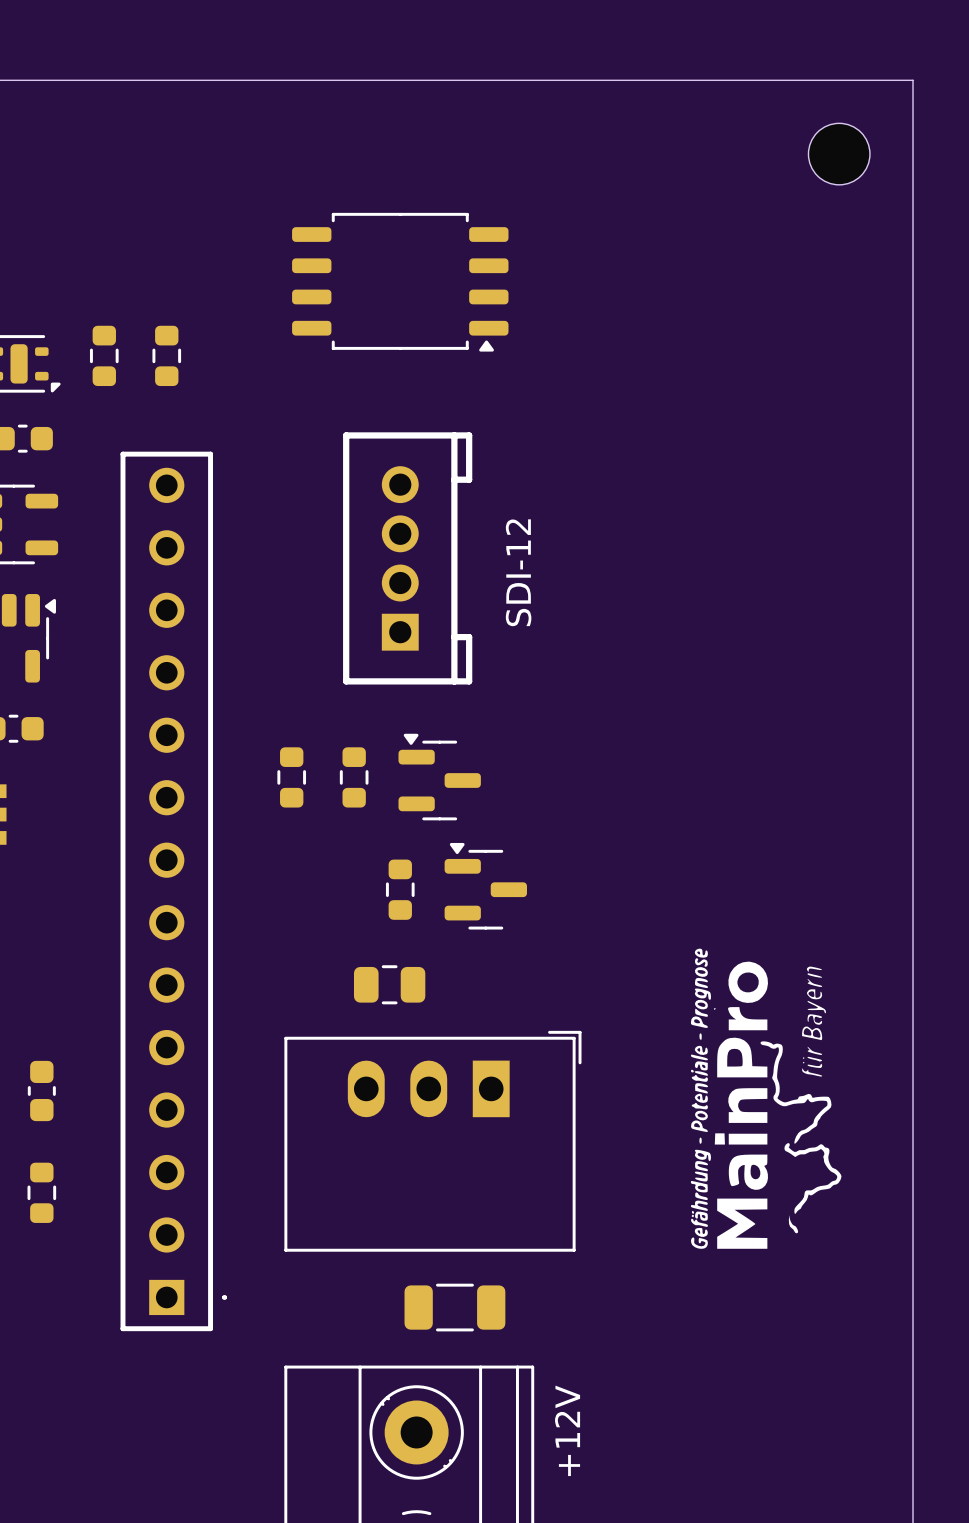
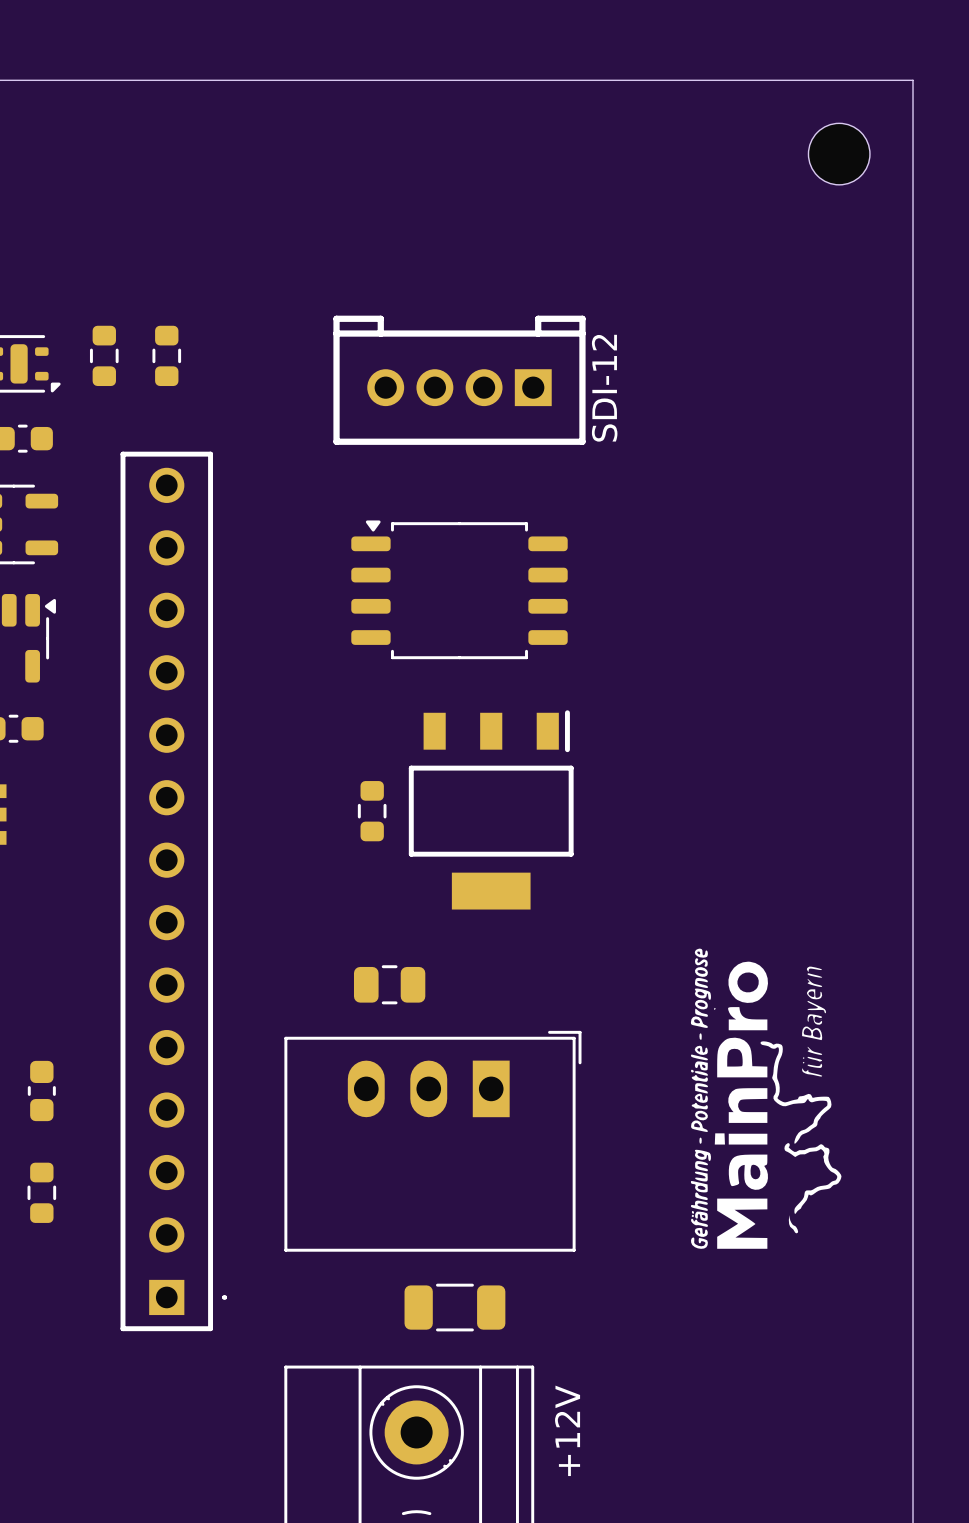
part rotation: 0° (400, 282) -> 180° (459, 589)
part position: (400, 282) -> (459, 589)
part rotation: 0° (407, 558) -> 90° counterclockwise (459, 380)
part position: (407, 558) -> (459, 380)
text position: SDI-12 (518, 572) -> SDI-12 (604, 388)
part: (291, 777) -> none
part position: (354, 777) -> (372, 811)
part: (439, 777) -> none
part: none -> (491, 809)
part: (485, 886) -> none
part: (400, 889) -> none

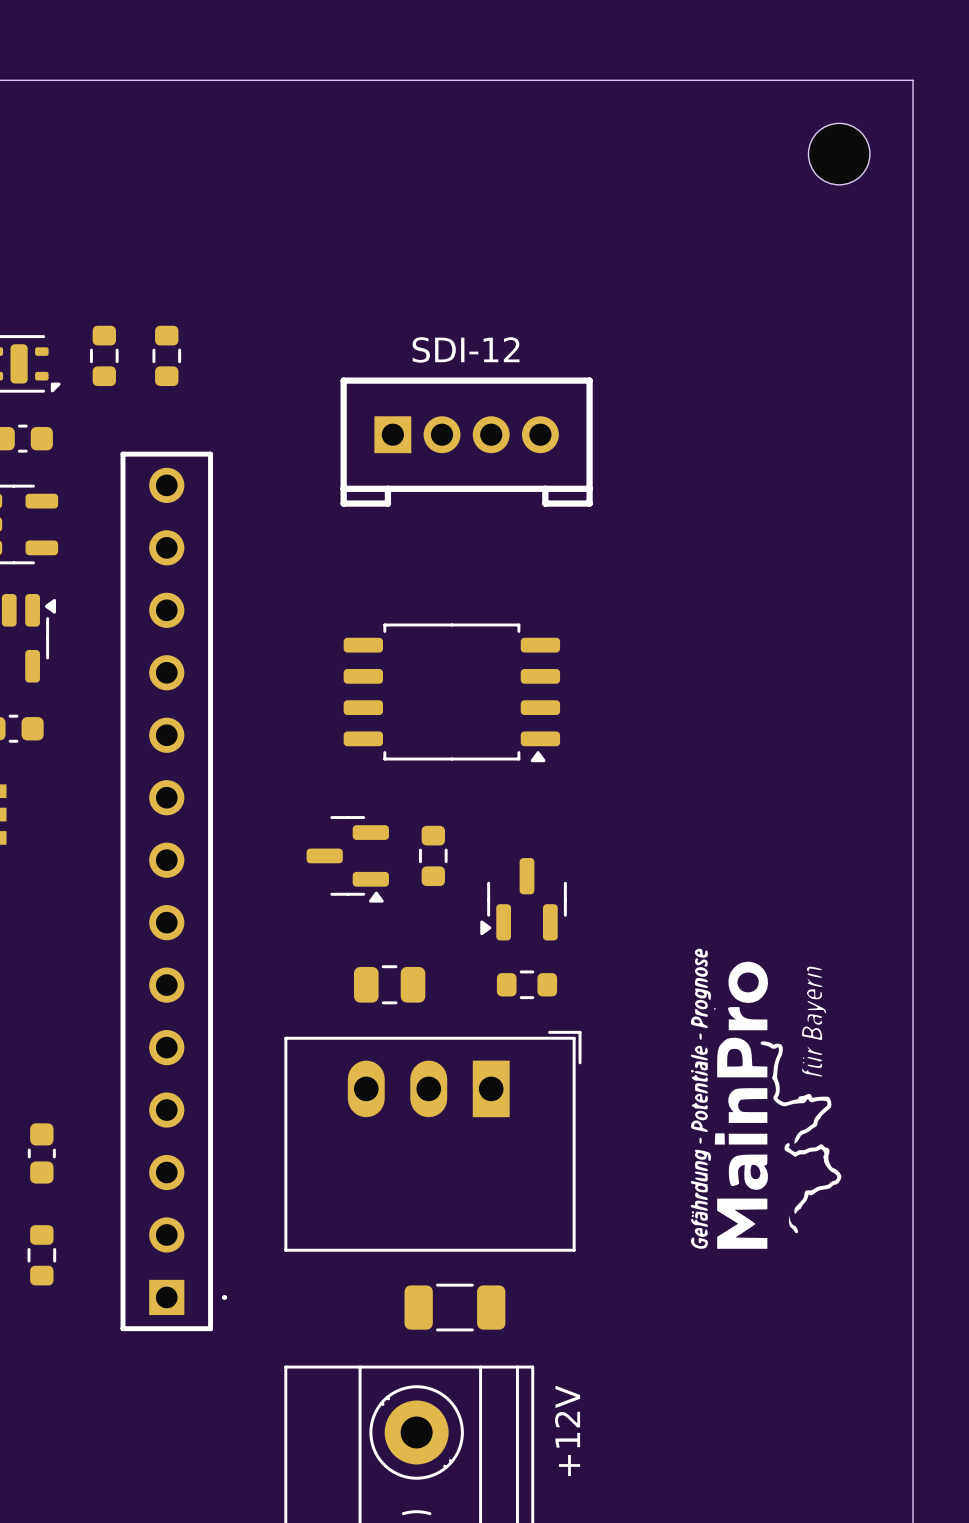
part rotation: 0° (459, 380) -> 180° (466, 442)
text rotation: 0° (604, 388) -> 90° clockwise (466, 349)
part rotation: 0° (459, 589) -> 180° (451, 692)
part: (491, 809) -> none
part position: (372, 811) -> (433, 855)
part: none -> (347, 859)
part: none -> (523, 899)
part: none -> (527, 984)
part position: (41, 1090) -> (41, 1153)
part: (41, 1192) -> none
part: none -> (41, 1255)

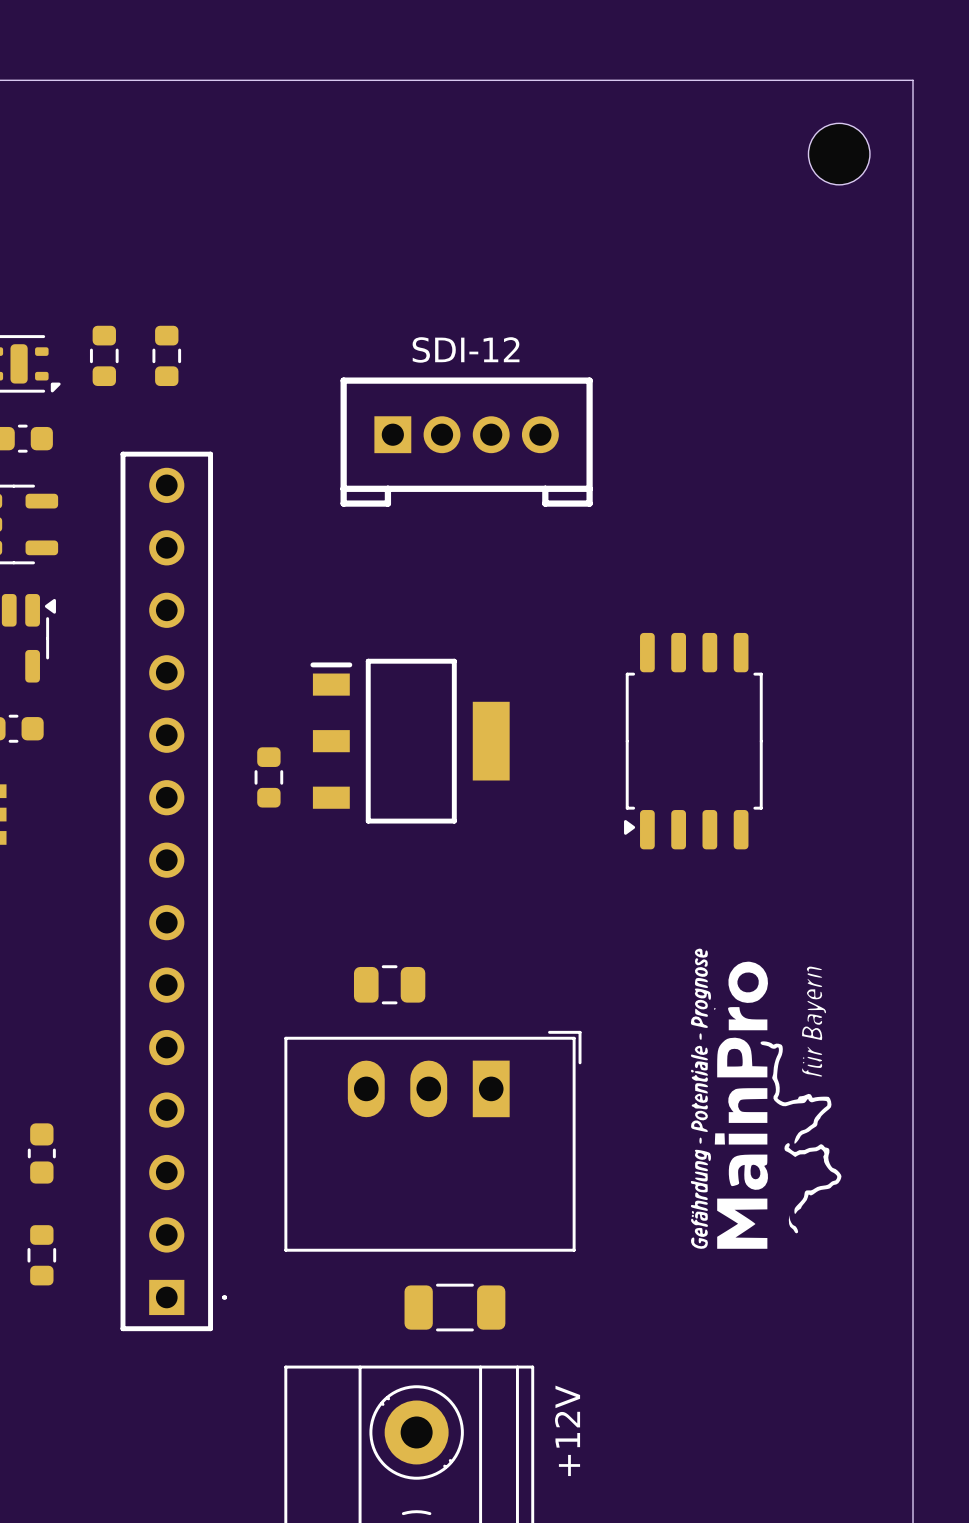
part rotation: 0° (451, 692) -> 90° clockwise (693, 741)
part position: (451, 692) -> (693, 741)
part: none -> (410, 741)
part: none -> (268, 777)
part: (433, 855) -> none
part: (347, 859) -> none
part: (523, 899) -> none
part: (527, 984) -> none

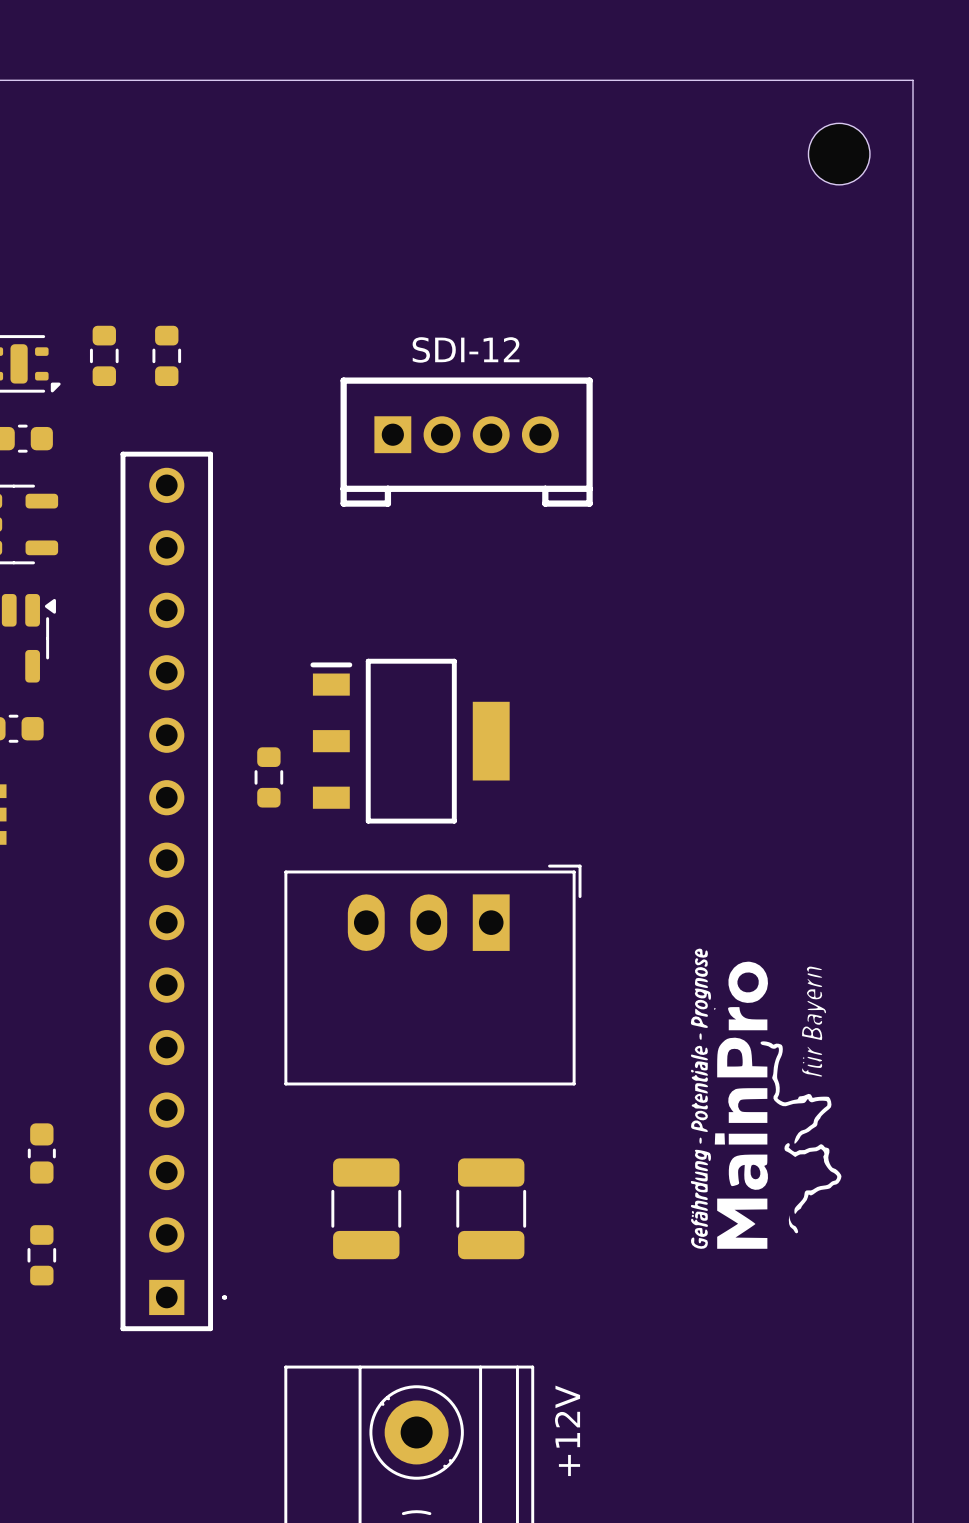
part: (693, 741) -> none
part: (389, 984) -> none
part position: (432, 1141) -> (432, 975)
part: none -> (366, 1208)
part: none -> (491, 1208)
part: (454, 1307) -> none

